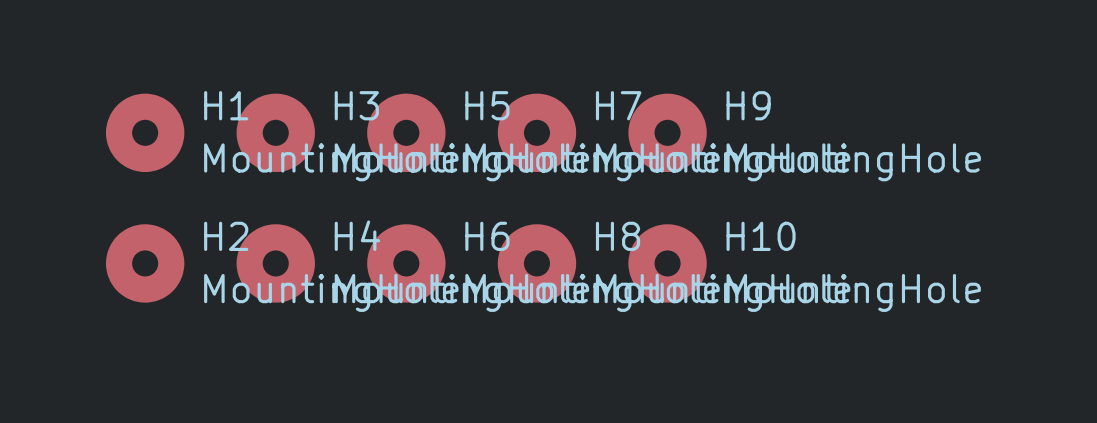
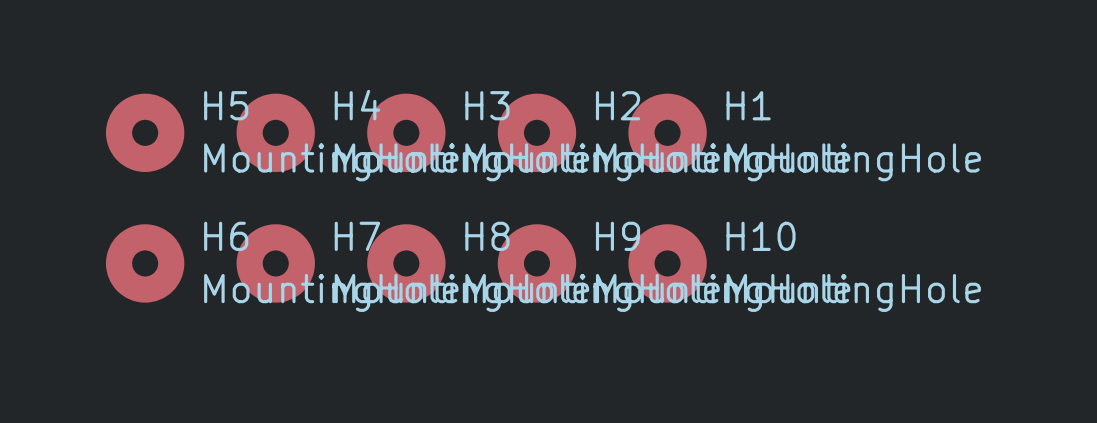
H1 name: H1 (226, 105) -> H5 (226, 105)
H3 name: H3 (356, 105) -> H4 (357, 105)
H5 name: H5 (487, 105) -> H3 (487, 105)
H7 name: H7 (618, 105) -> H2 (618, 105)
H9 name: H9 (748, 105) -> H1 (748, 105)
H4 name: H4 (357, 235) -> H7 (357, 236)
H2 name: H2 (226, 236) -> H6 (226, 236)
H6 name: H6 (487, 236) -> H8 (487, 236)
H8 name: H8 (618, 236) -> H9 (618, 236)

